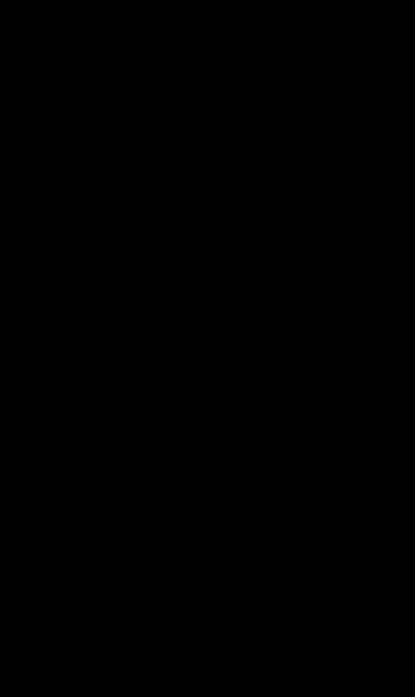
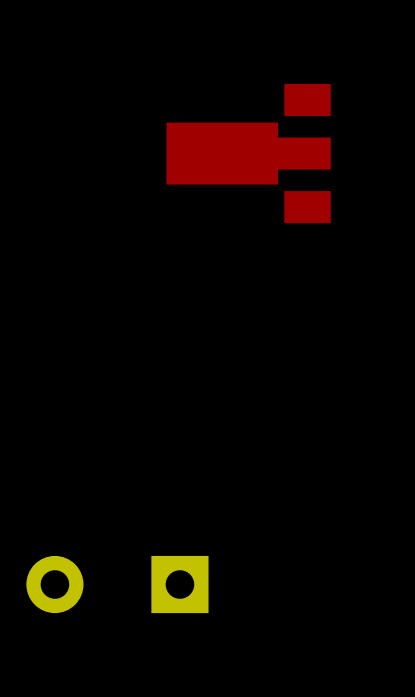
part: none -> (248, 153)
part: none -> (117, 584)

